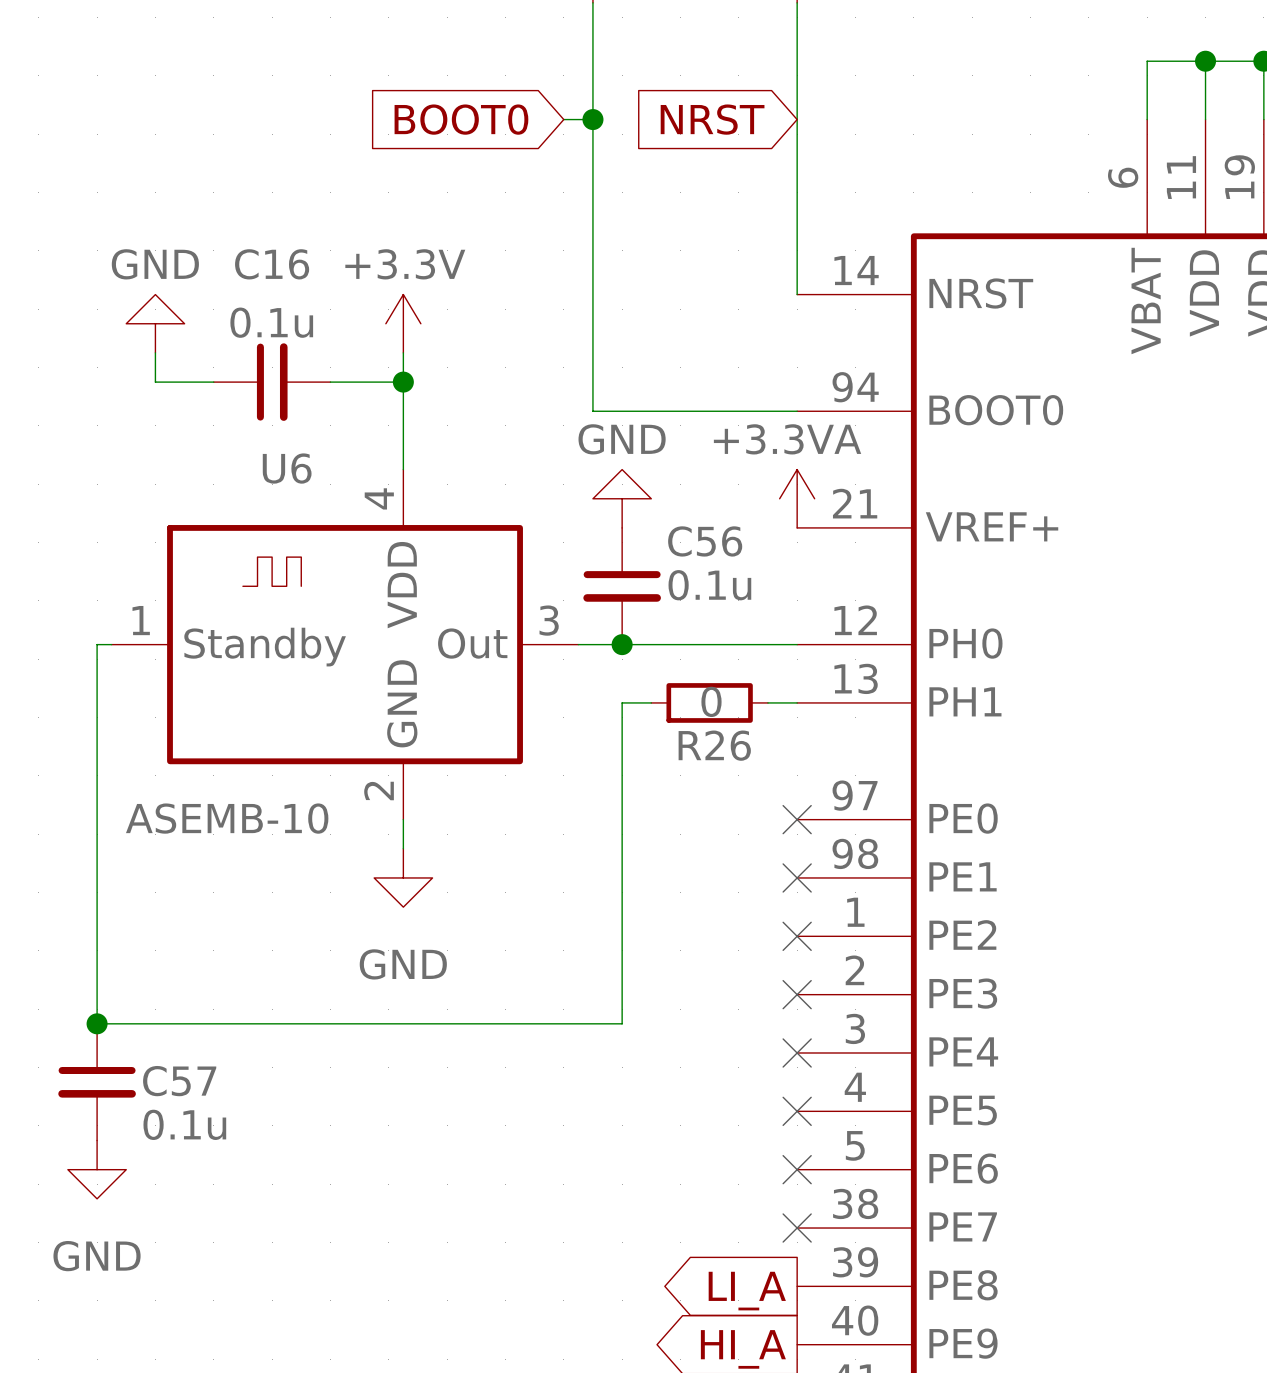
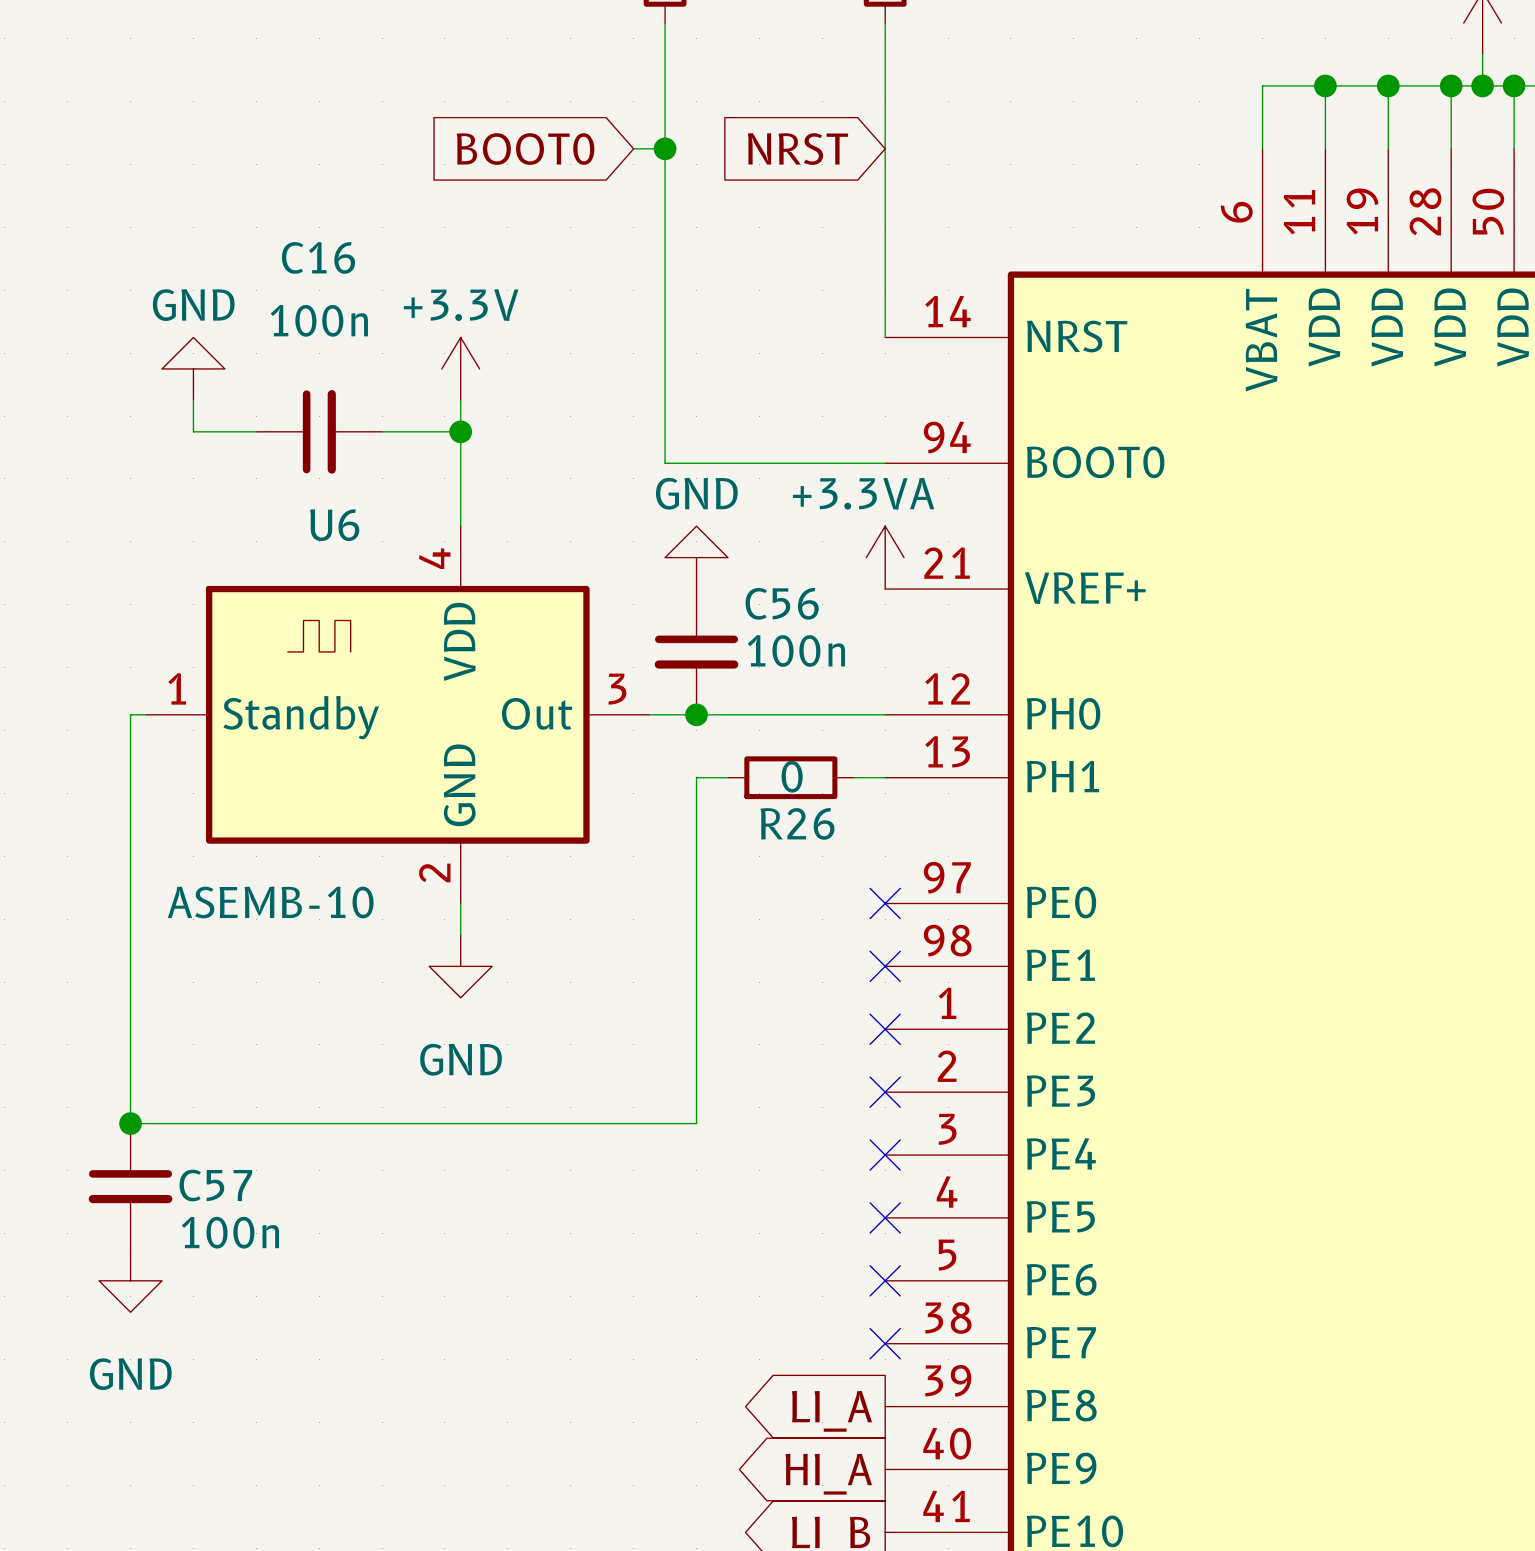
C16 name position: C16 (272, 264) -> C16 (318, 257)
C16 value: 0.1u (271, 322) -> 100n (319, 320)
C56 value: 0.1u (709, 585) -> 100n (796, 650)
C57 value: 0.1u (184, 1124) -> 100n (230, 1232)

